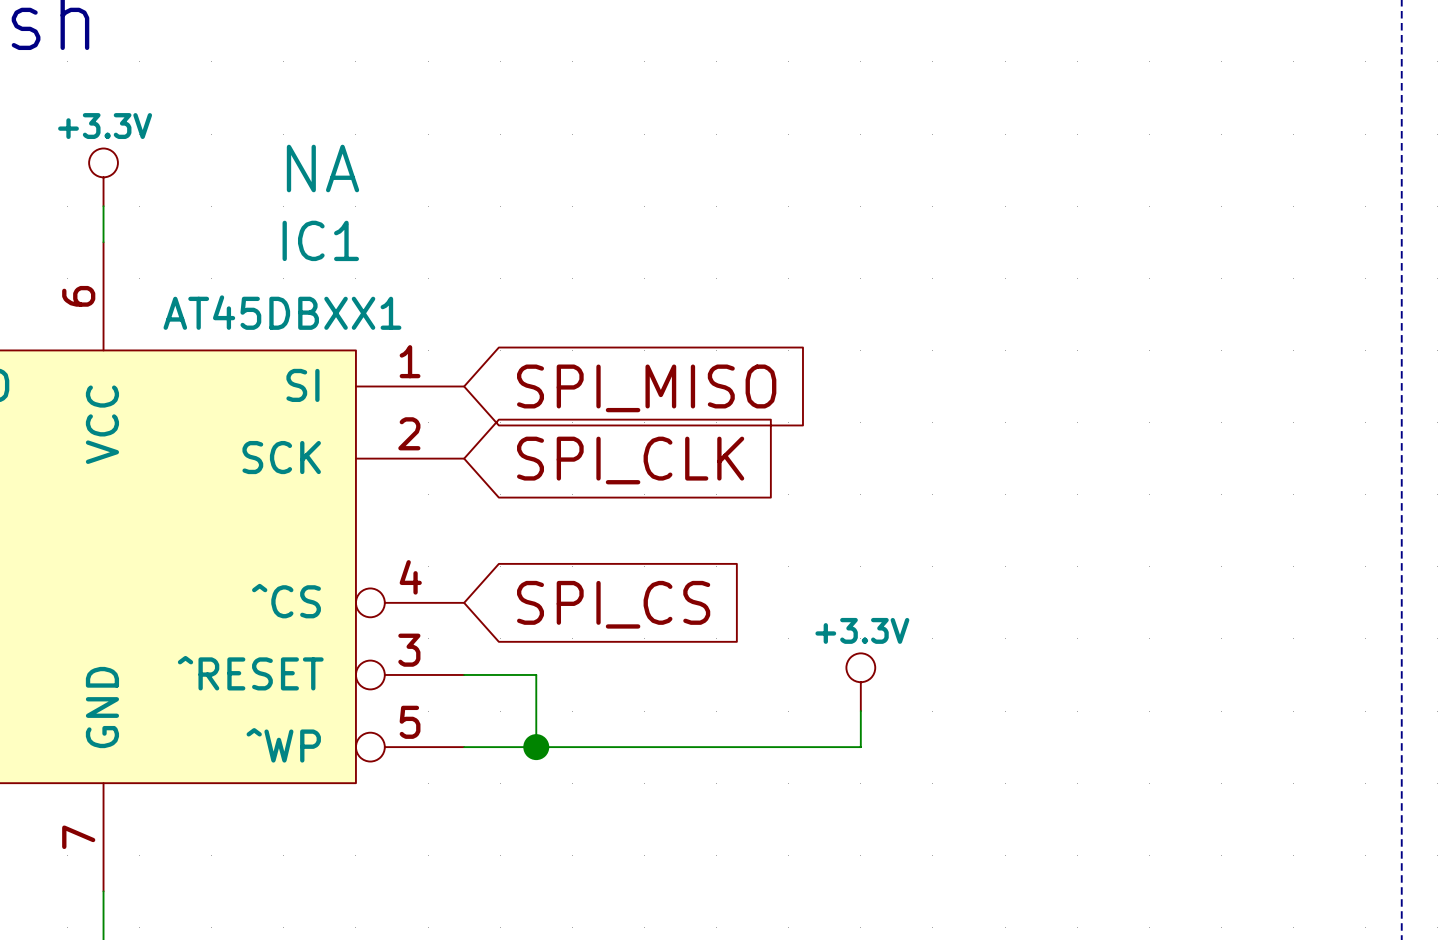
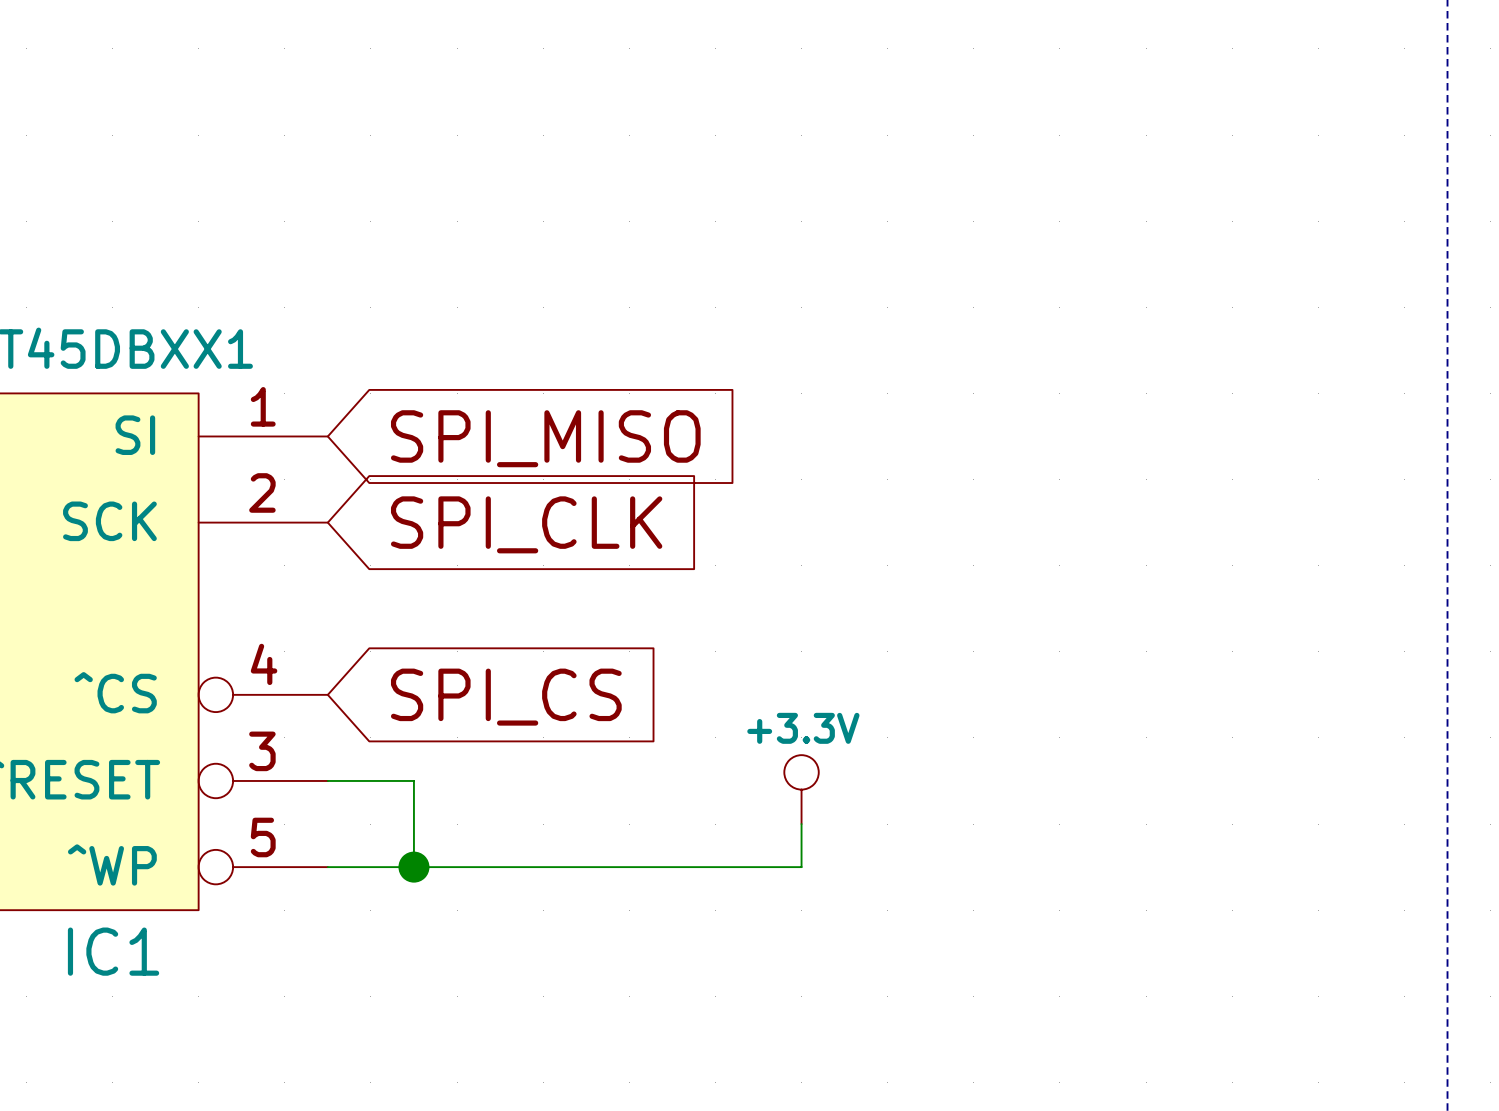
IC1 text: NA (322, 168) -> none
IC1 name position: IC1 (320, 240) -> IC1 (113, 951)

